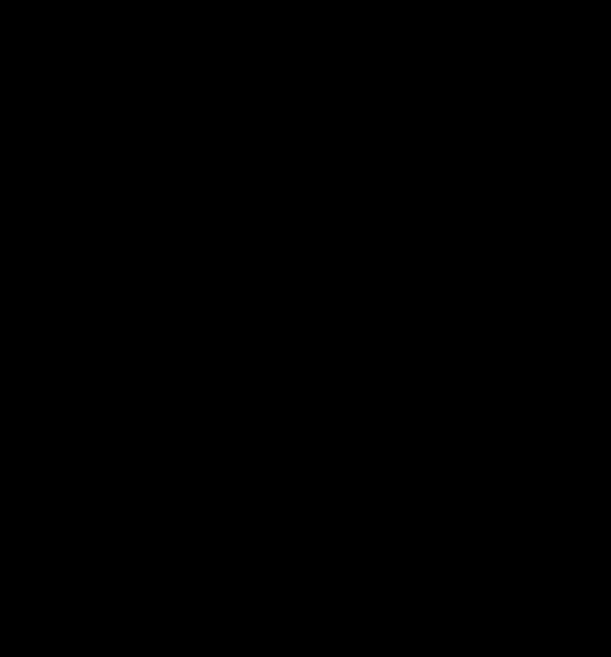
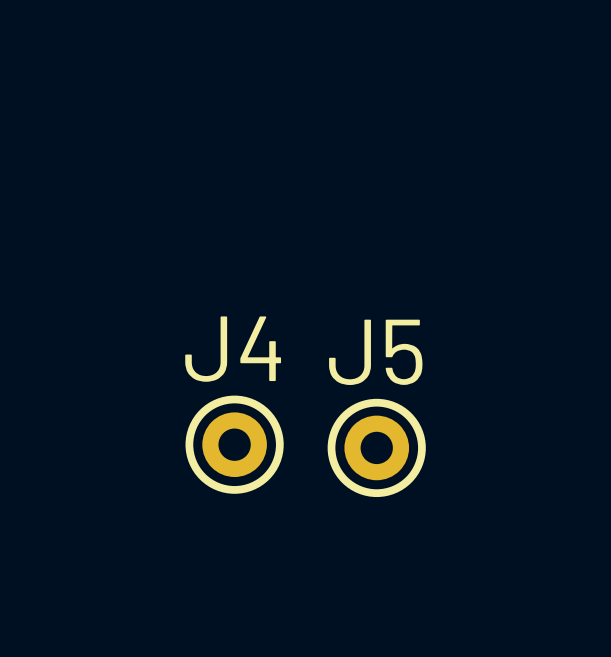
J4: none -> (234, 444)
J5: none -> (376, 447)

